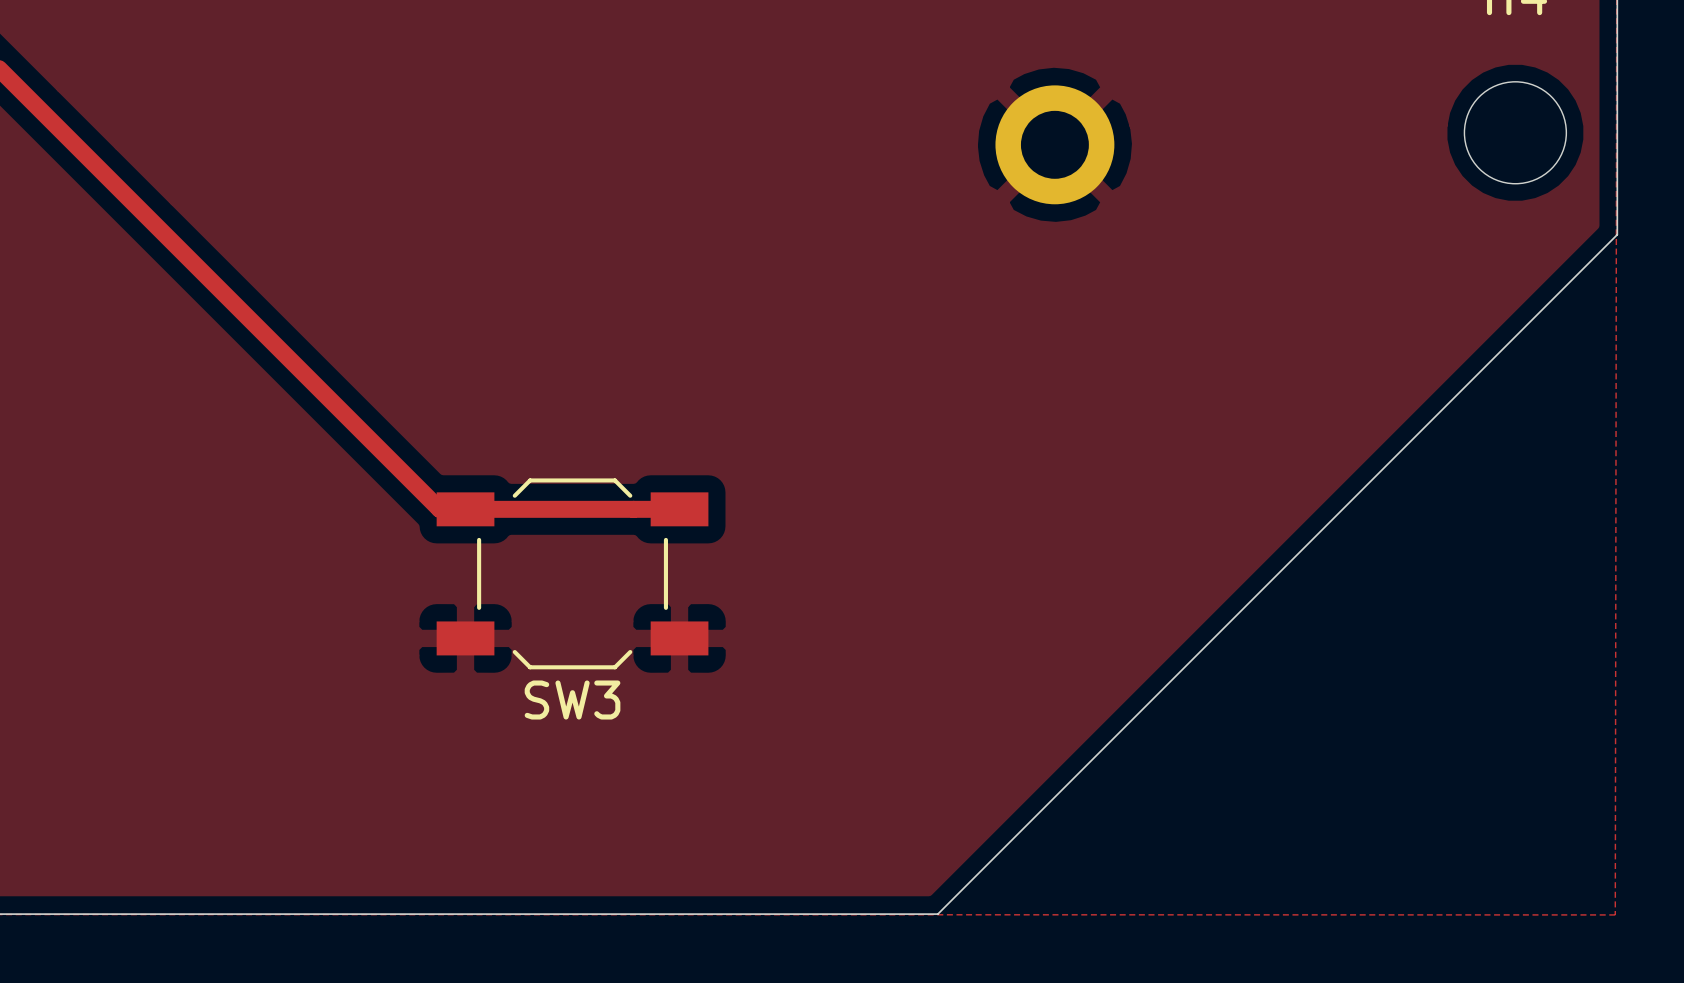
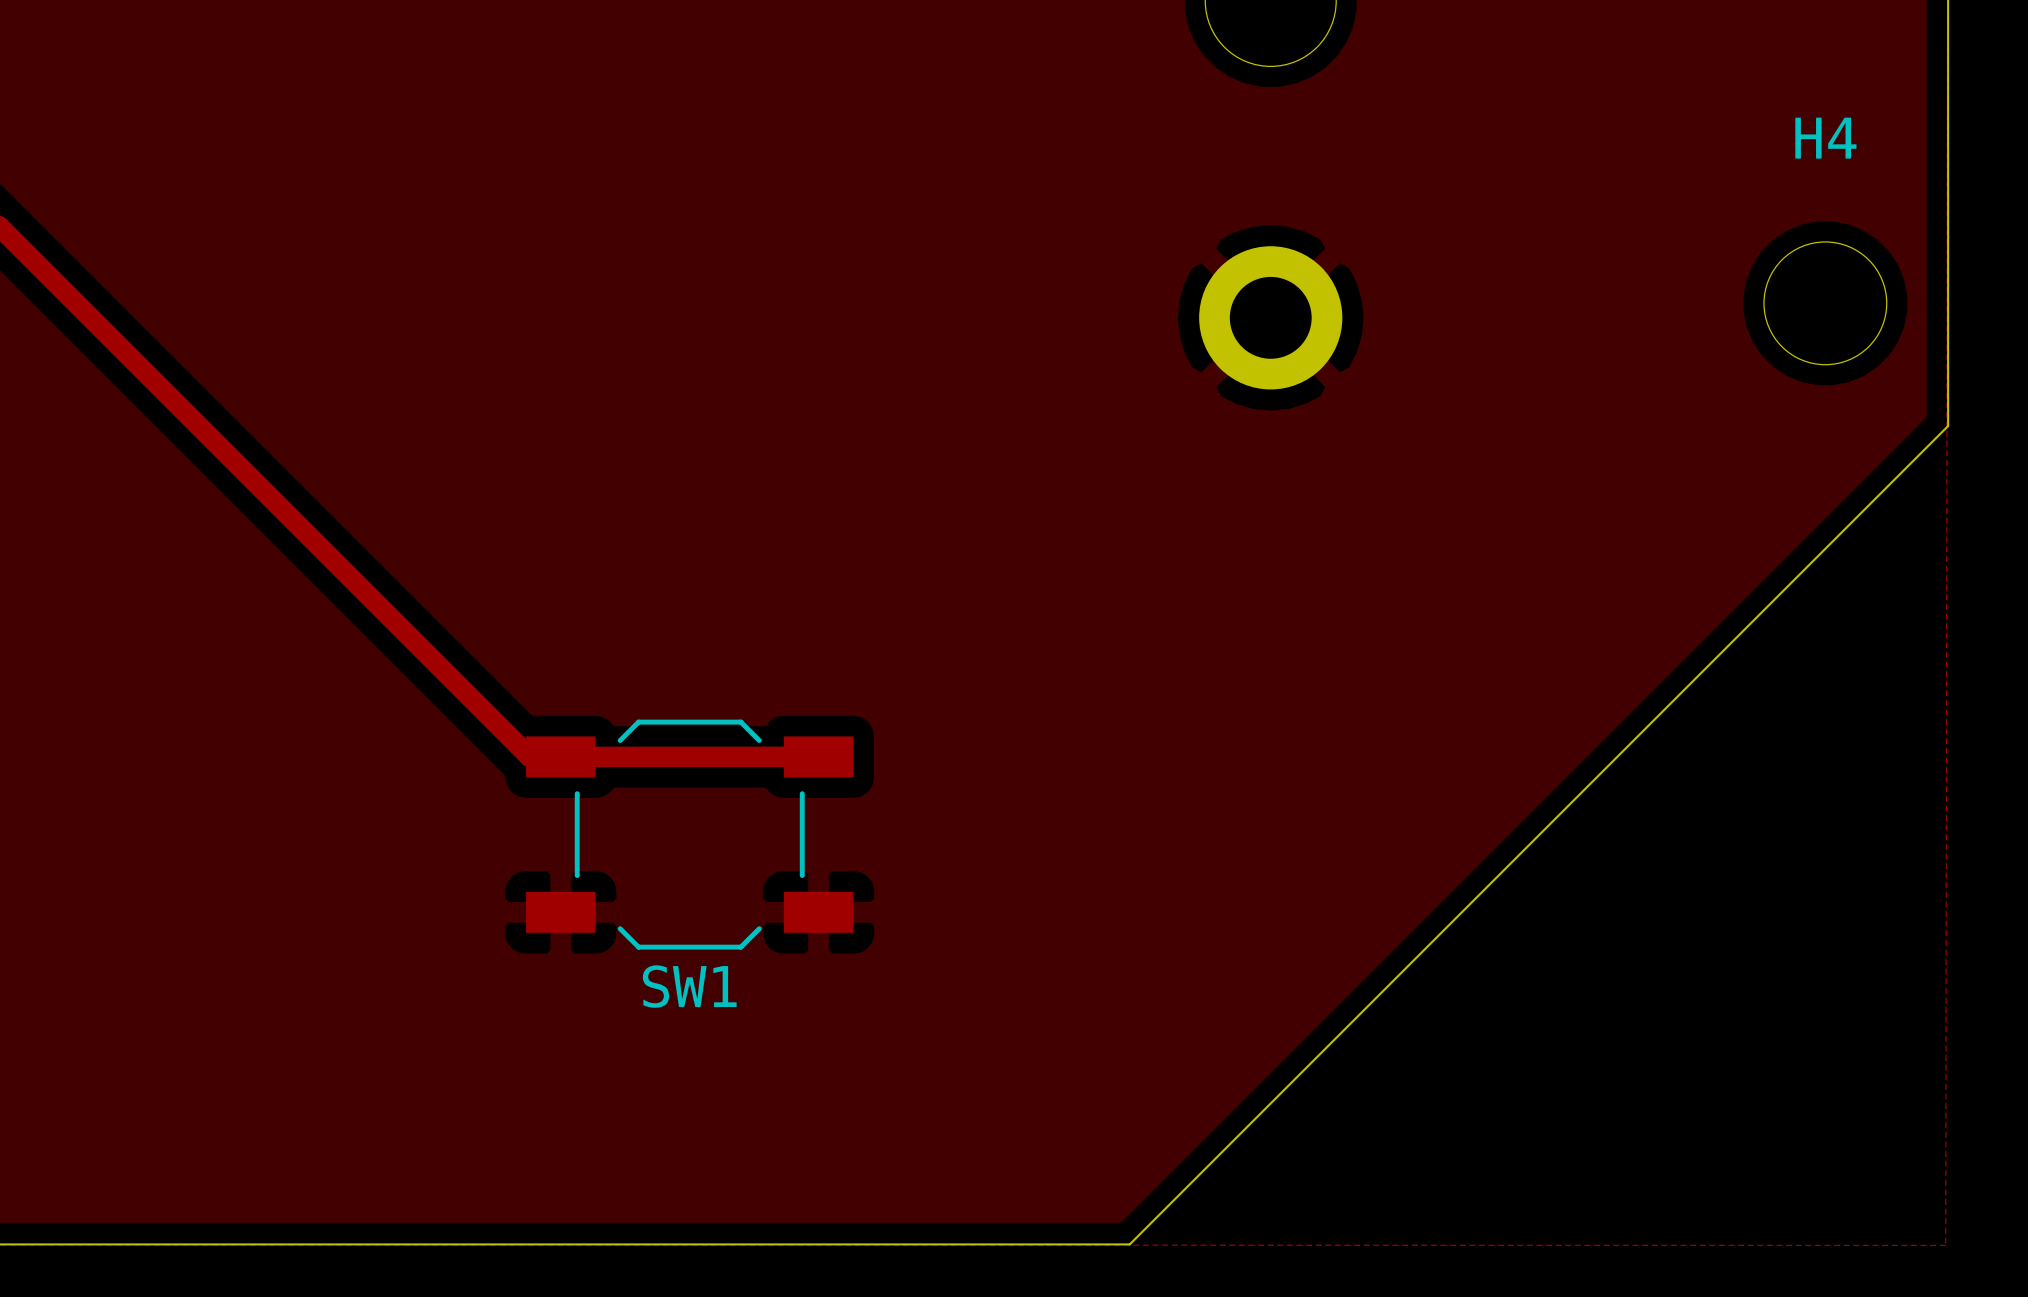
SW3 name: SW3 (572, 700) -> SW1 (689, 986)

